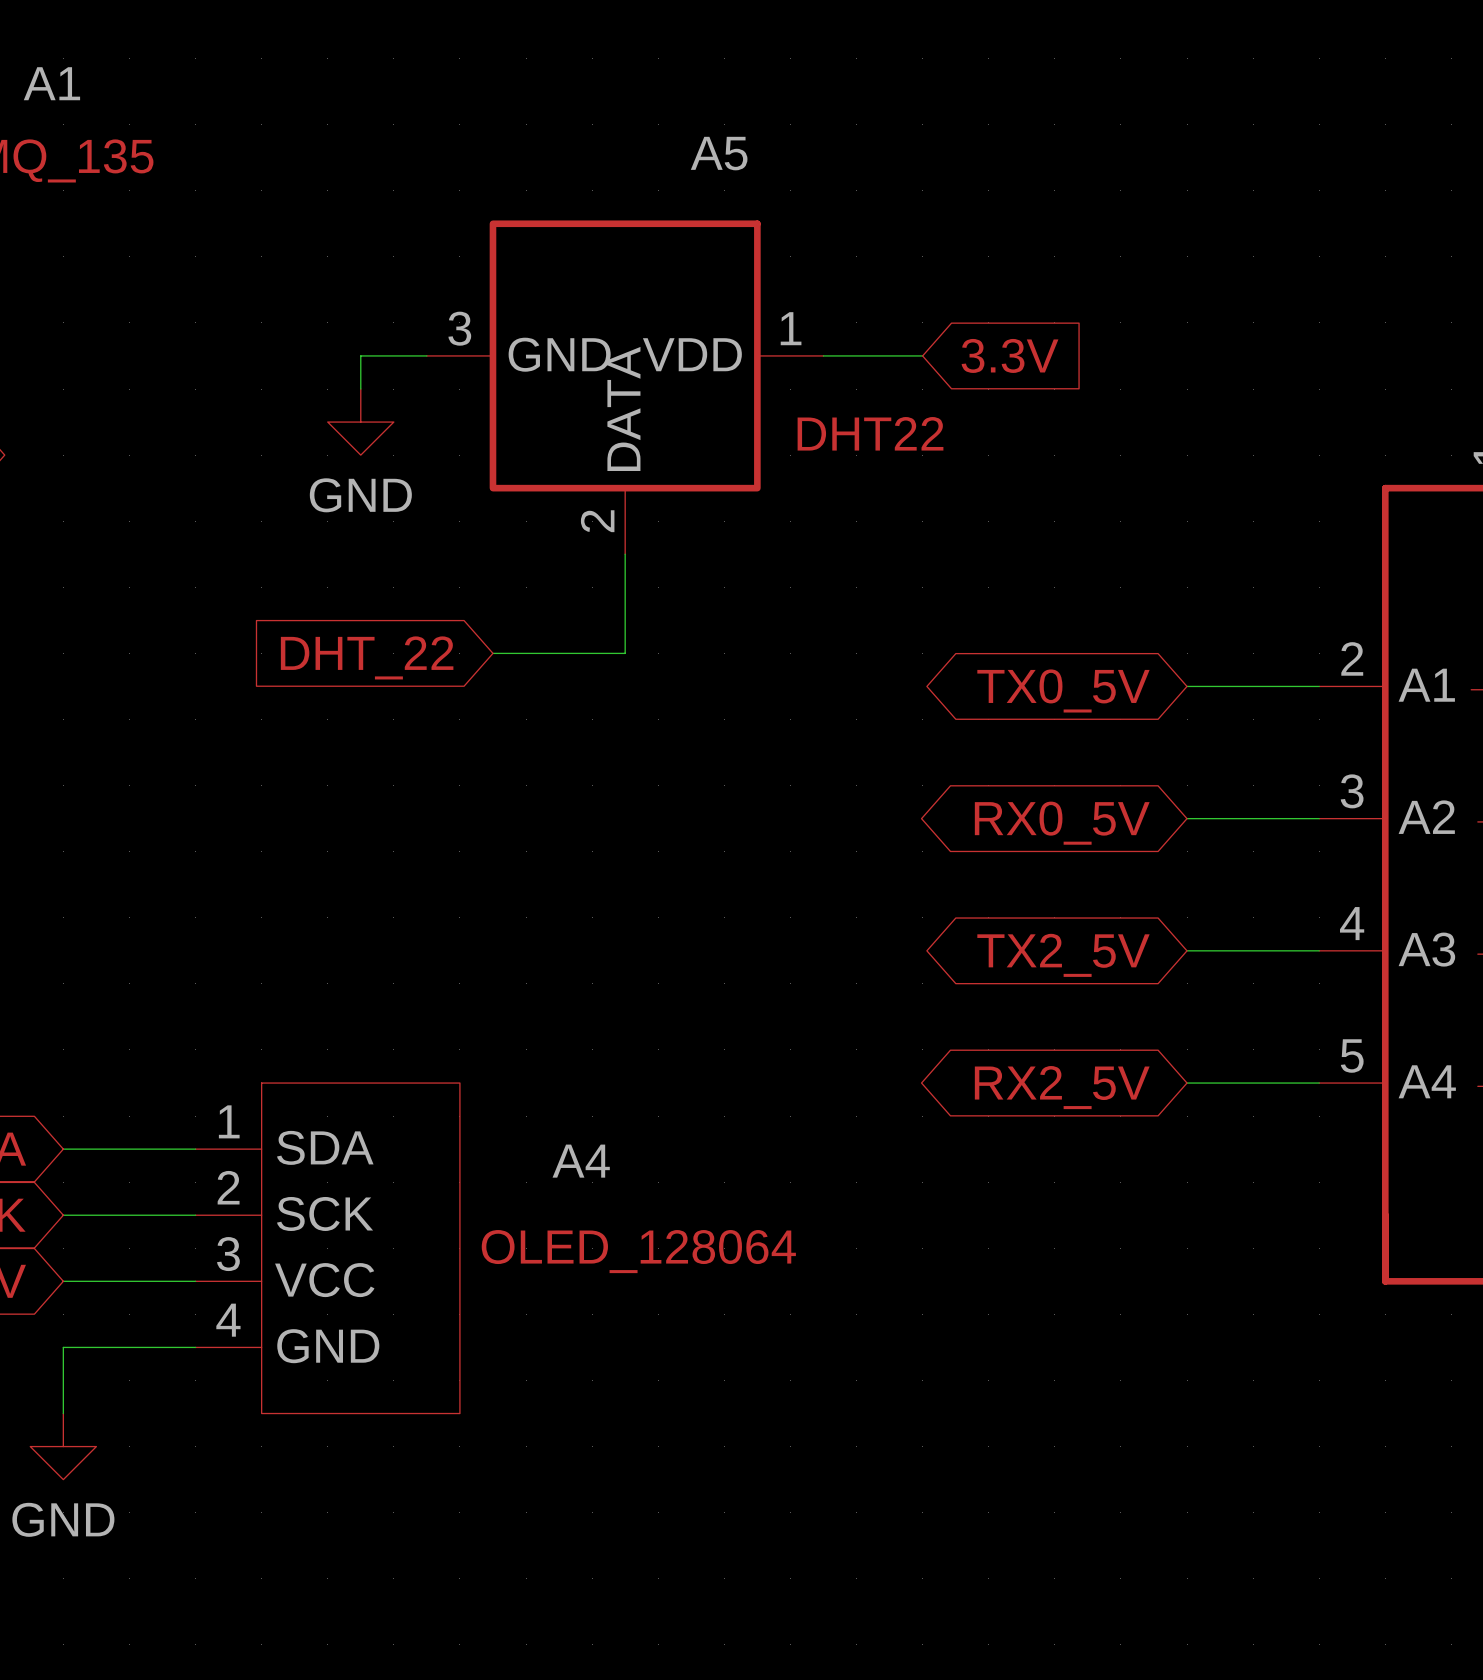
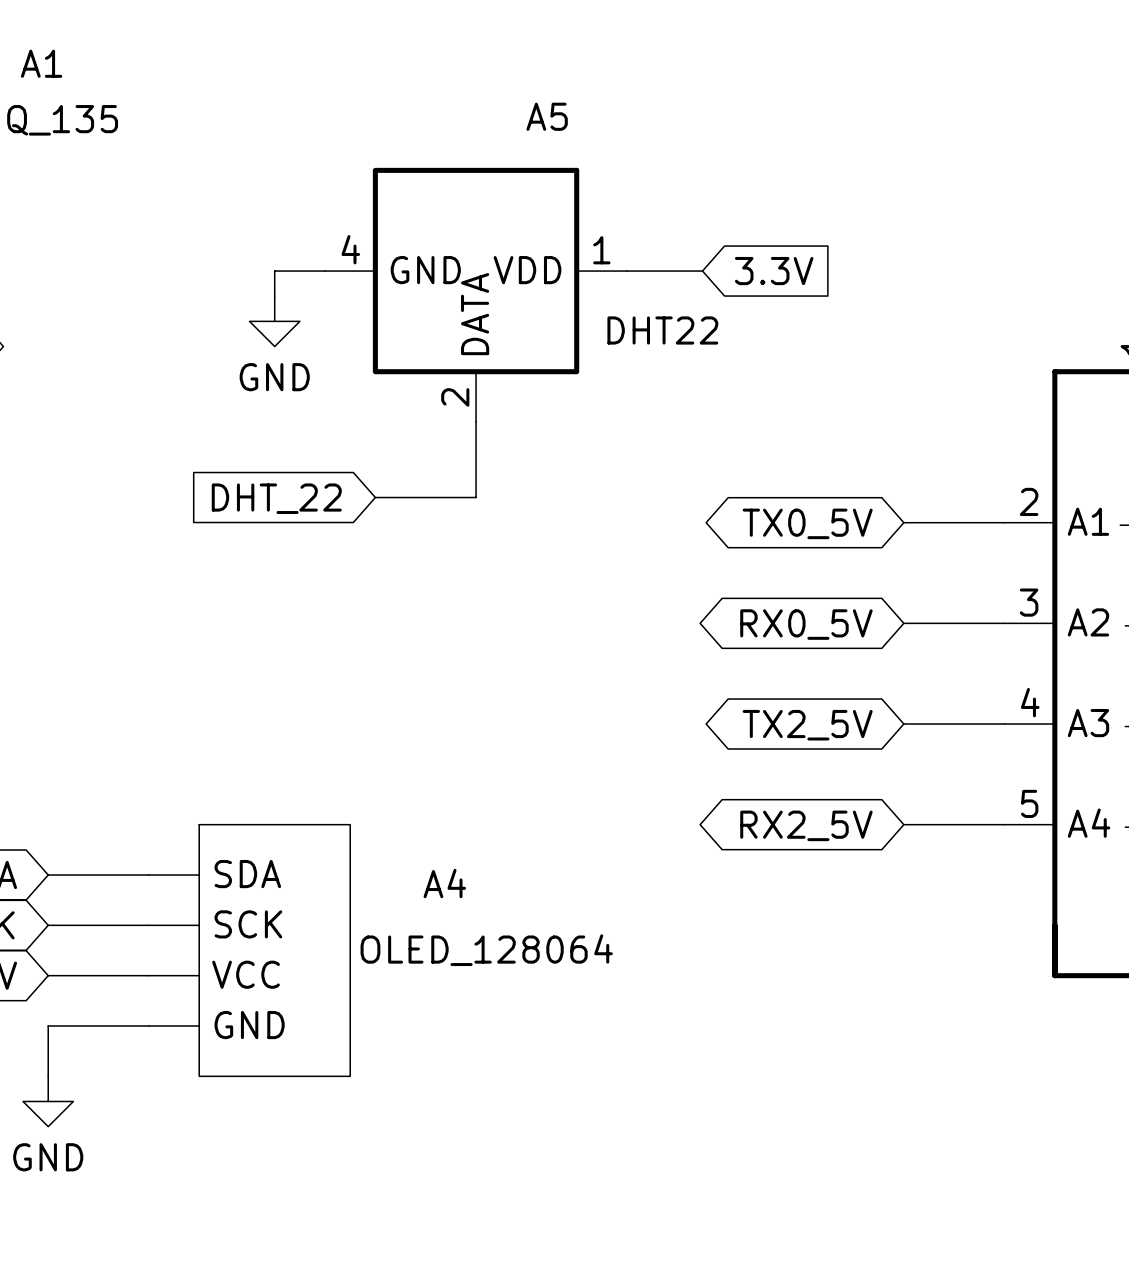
A5 pin number: 3 (459, 328) -> 4 (350, 249)
A4 pin number: 1 (229, 1121) -> none
A4 pin number: 2 (228, 1187) -> none
A4 pin number: 3 (228, 1254) -> none
A4 pin number: 4 (228, 1320) -> none

